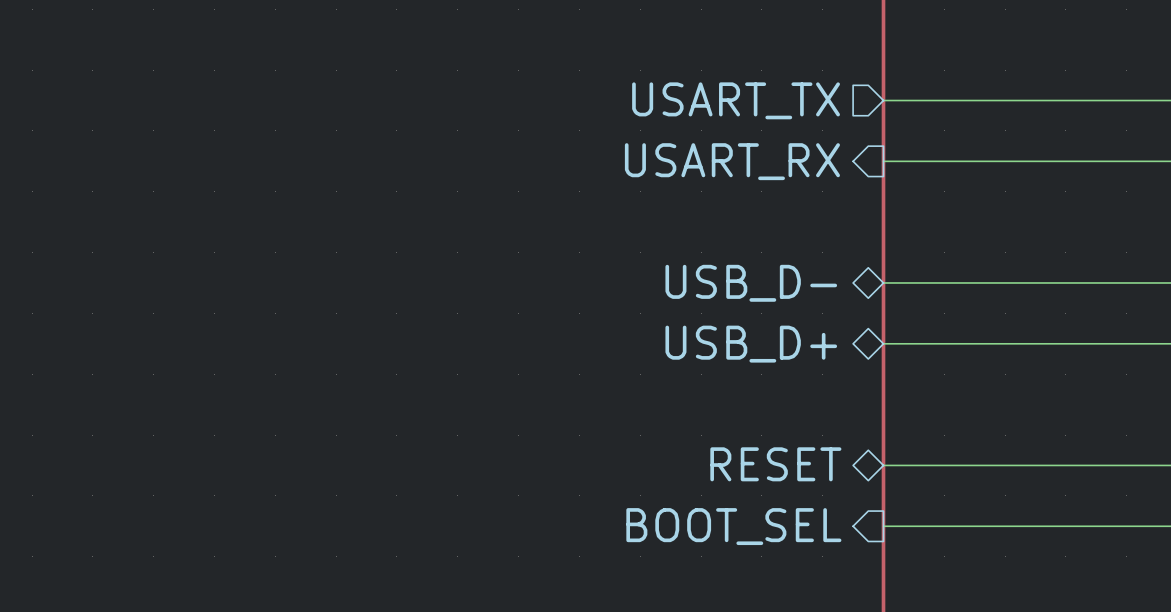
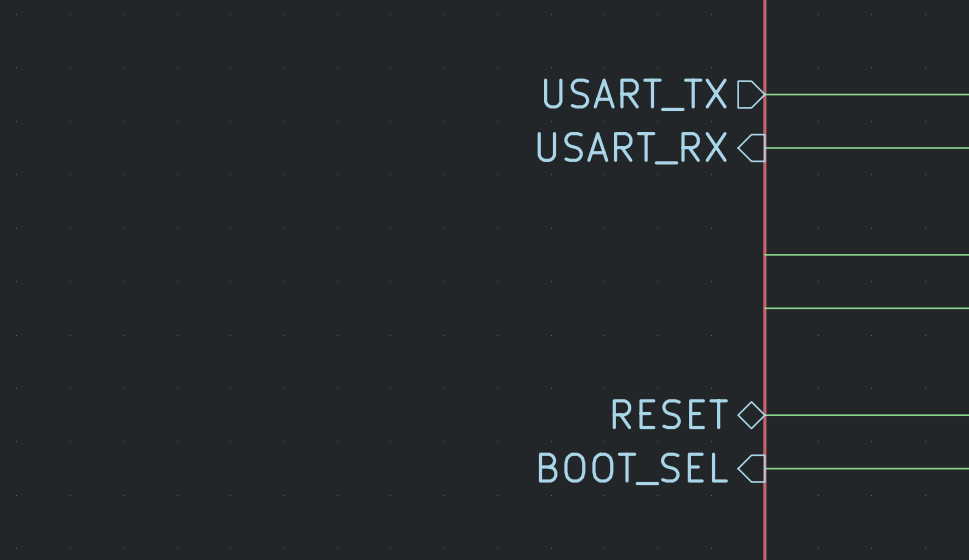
sheet pin: USB_D- (751, 283) -> none
sheet pin: USB_D+ (751, 344) -> none

